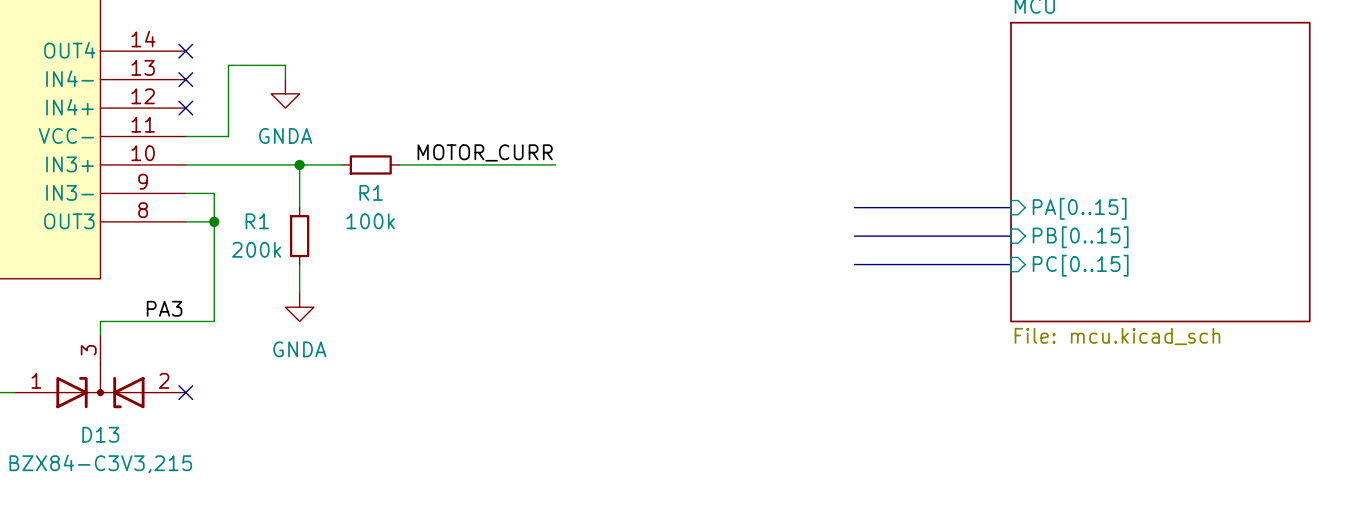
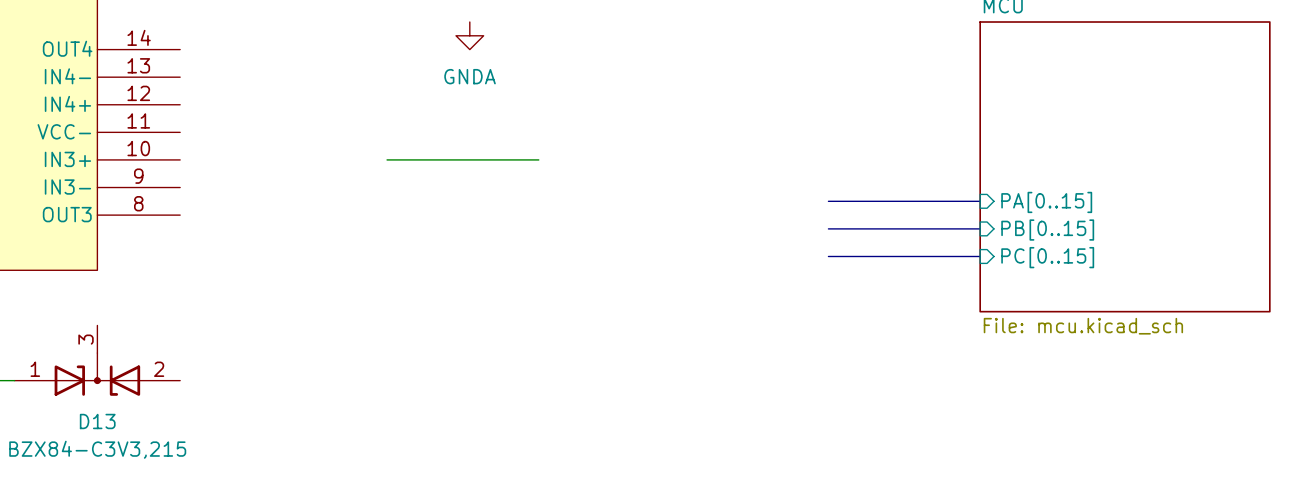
power symbol: none -> GNDA (469, 35)
no-connect mark: (185, 51) -> none
no-connect mark: (185, 79) -> none
wire: (285, 79) (285, 65) (228, 65) (228, 136) (185, 136) -> none
power symbol: GNDA (285, 93) -> none
no-connect mark: (185, 108) -> none
label: MOTOR_CURR (485, 152) -> none
wire: (185, 164) (342, 164) -> none
wire: (299, 164) (299, 207) -> none
junction: (299, 164) -> none
R1: 100k (370, 164) -> none
wire: (185, 193) (214, 193) (214, 321) (100, 321) (100, 335) -> none
wire: (185, 221) (214, 221) -> none
junction: (214, 221) -> none
R1: 200k (299, 236) -> none
wire: (299, 264) (299, 293) -> none
power symbol: GNDA (299, 307) -> none
label: PA3 (164, 308) -> none
no-connect mark: (185, 392) -> none

